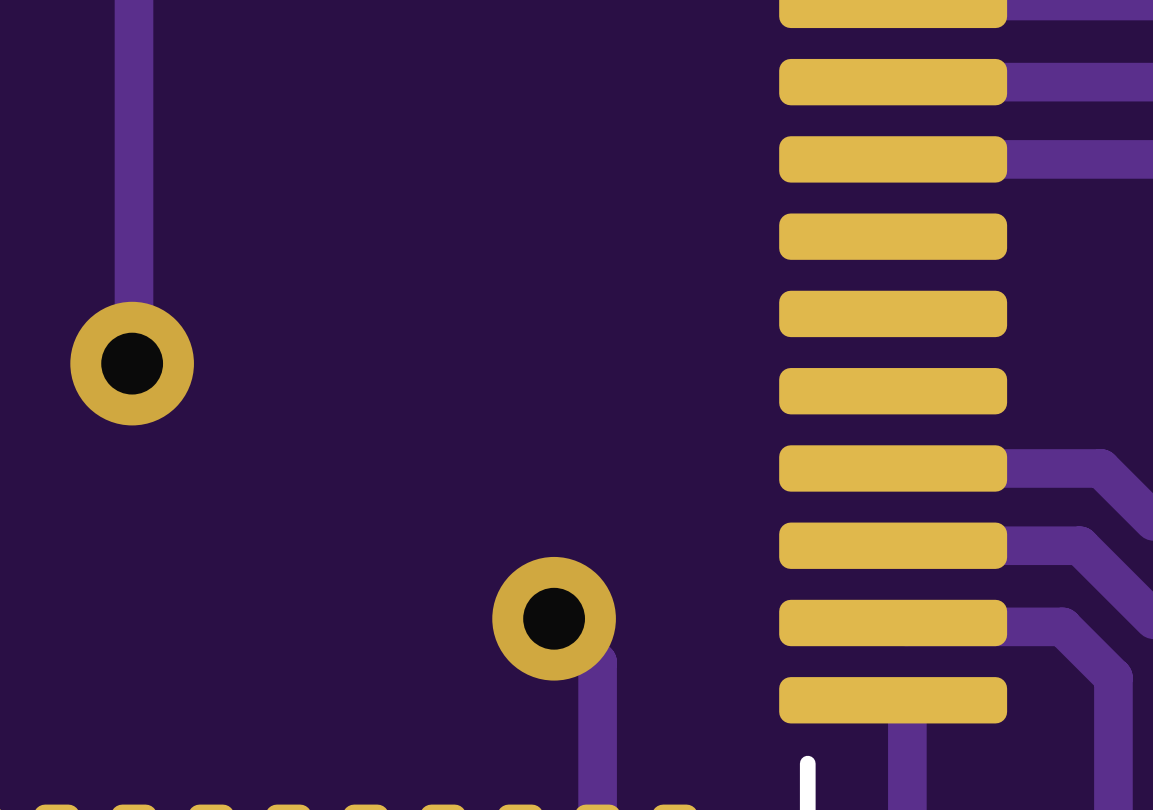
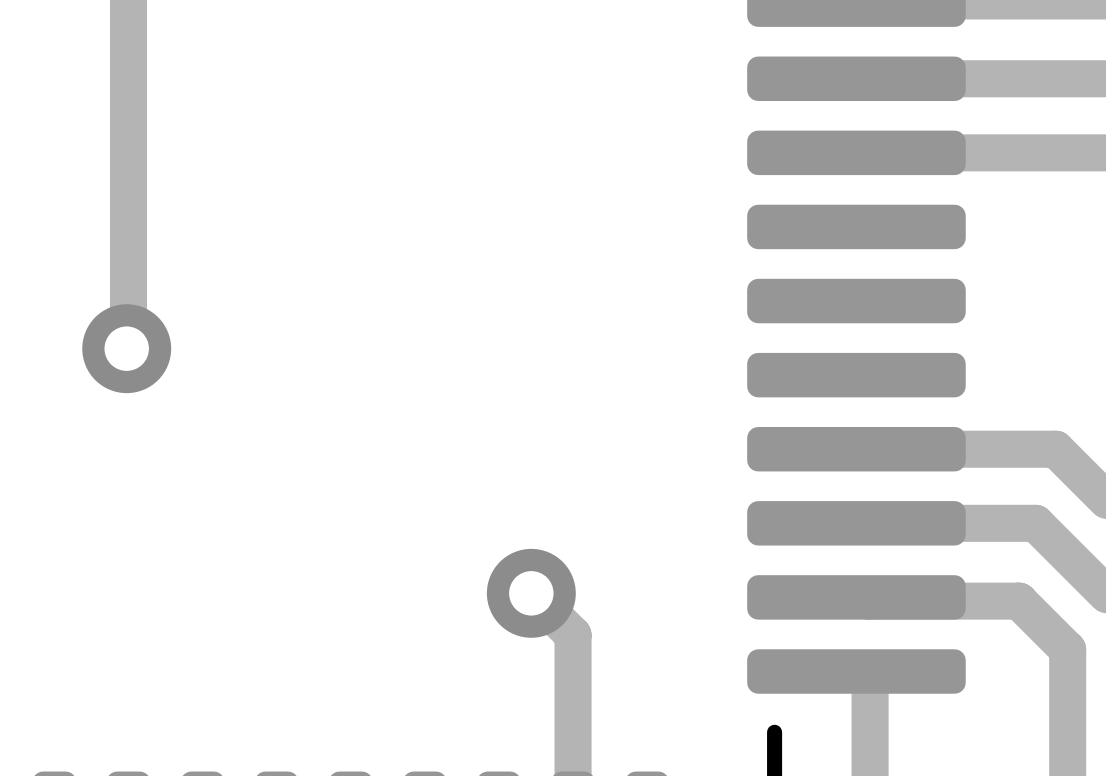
via size: [70, 301, 194, 426] -> [82, 304, 172, 394]
via size: [492, 556, 616, 681] -> [486, 548, 576, 638]

